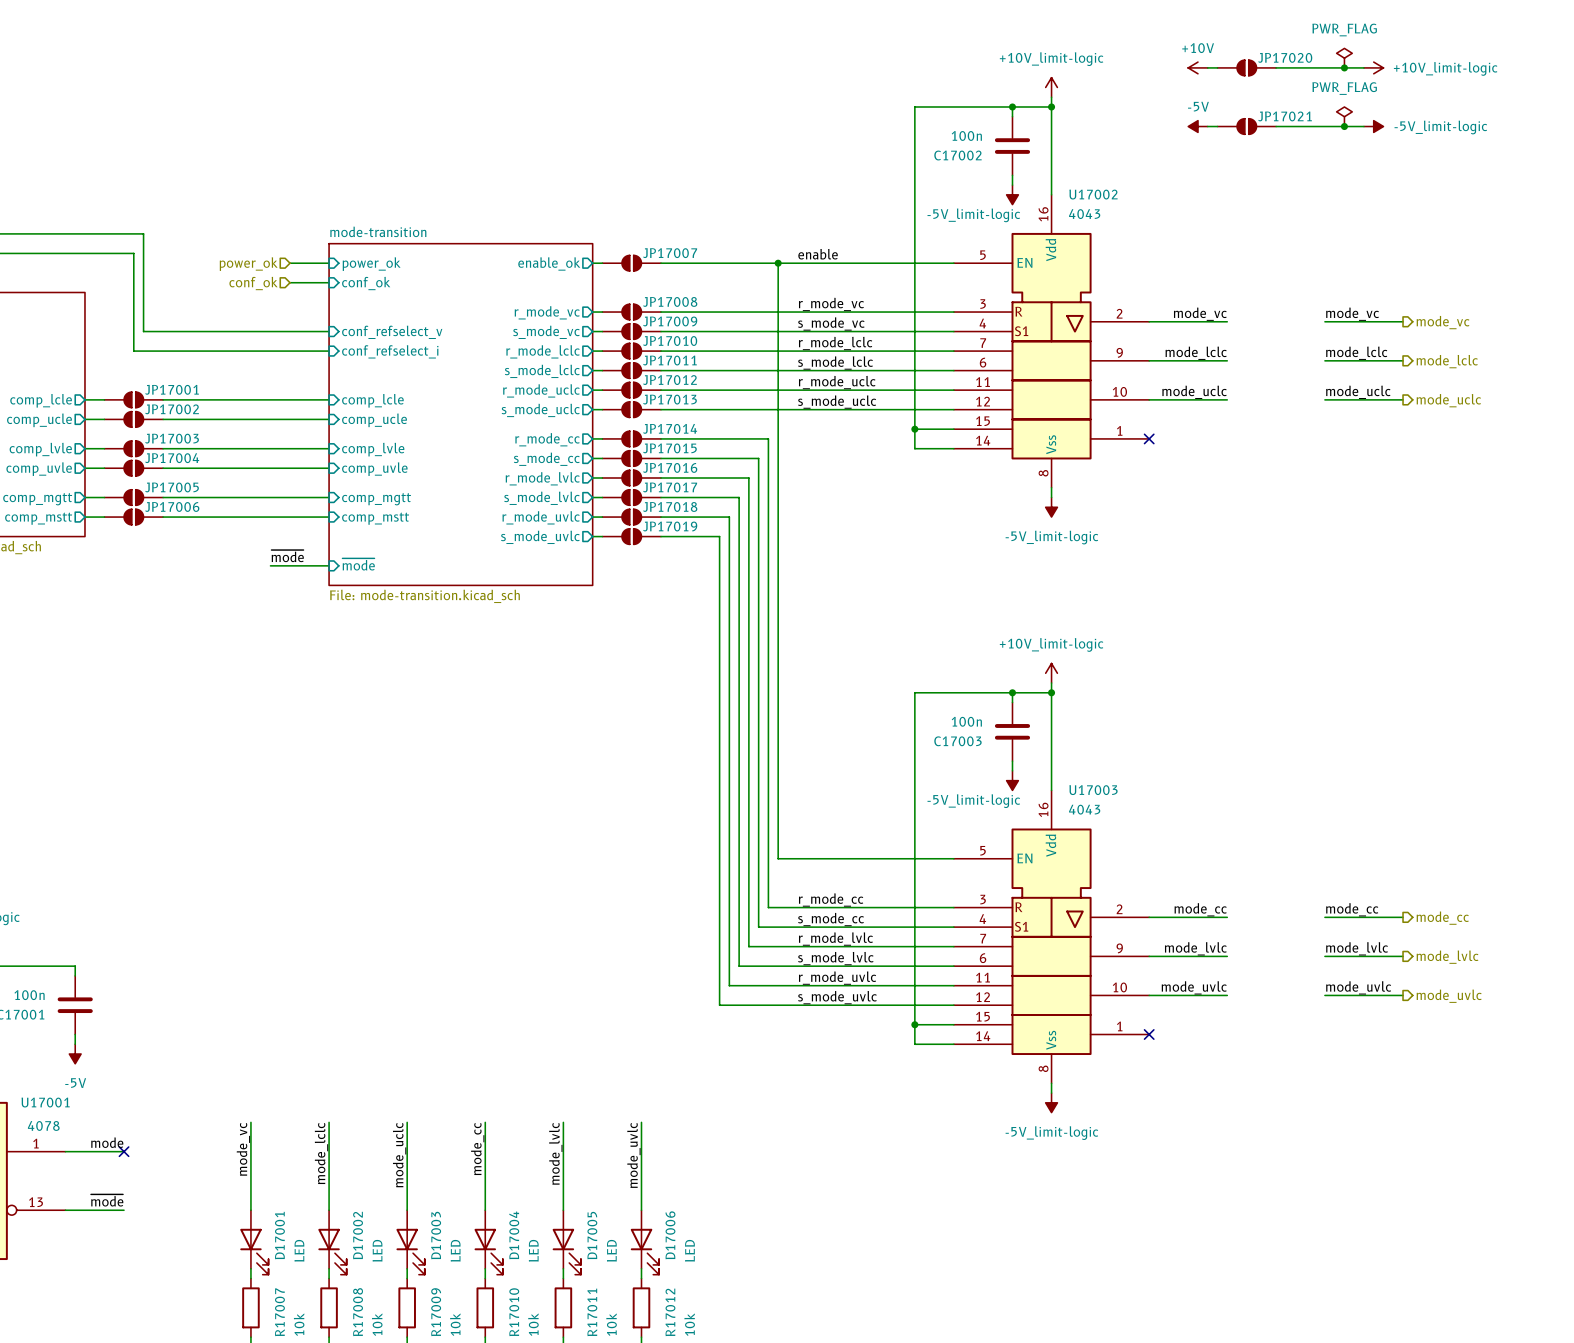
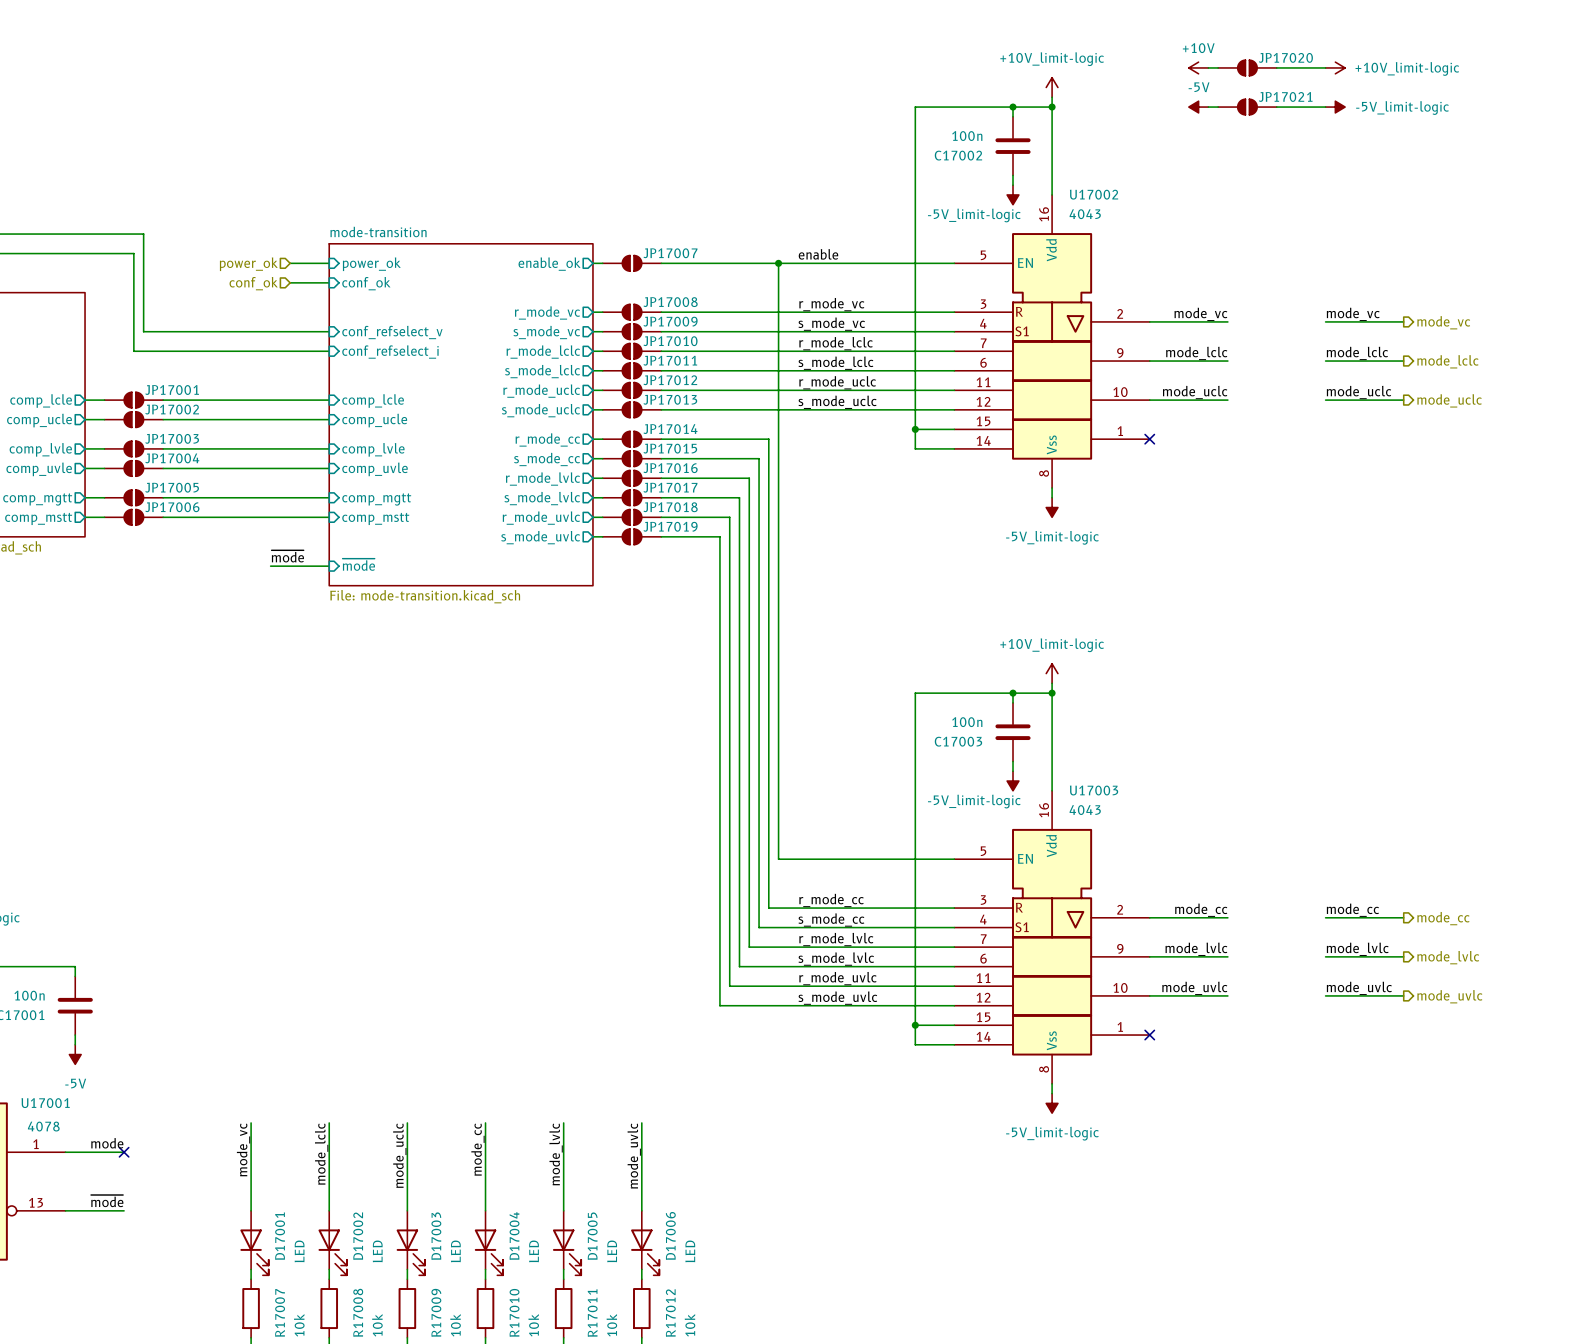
power symbol: PWR_FLAG (1344, 58) -> none
junction: (1344, 67) -> none
power symbol position: +10V_limit-logic (1373, 67) -> +10V_limit-logic (1335, 67)
wire: none -> (1276, 107) (1325, 107)
power symbol: PWR_FLAG (1344, 116) -> none
power symbol position: -5V (1197, 126) -> -5V (1198, 107)
wire: (1207, 126) (1217, 126) -> (1208, 107) (1218, 107)
JP17021 position: (1246, 126) -> (1247, 107)
wire: (1276, 126) (1363, 126) -> none
junction: (1344, 126) -> none
power symbol position: -5V_limit-logic (1373, 126) -> -5V_limit-logic (1335, 107)

